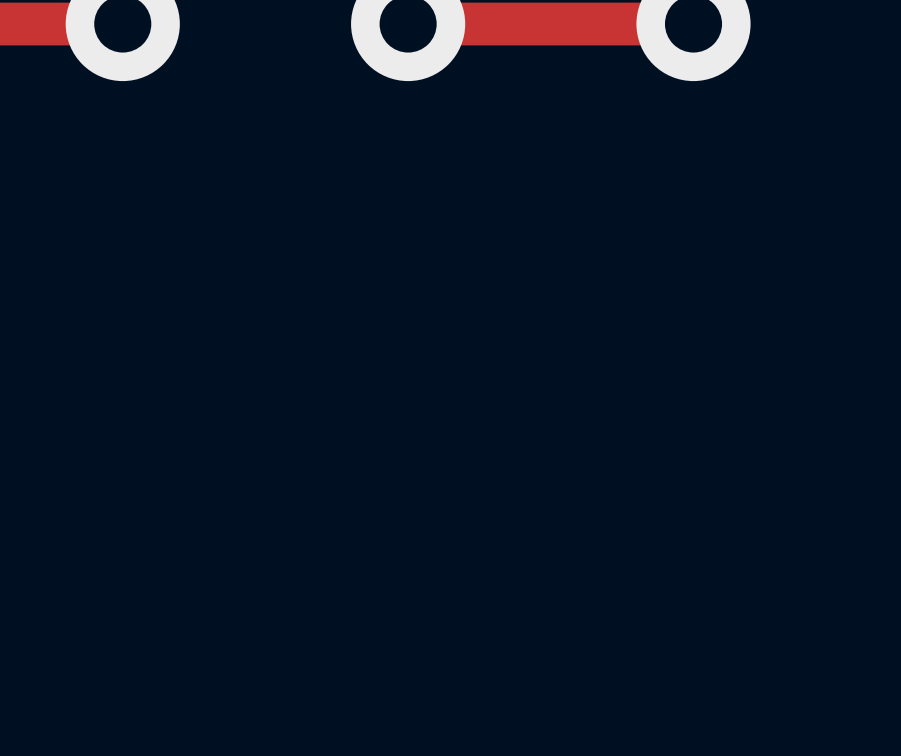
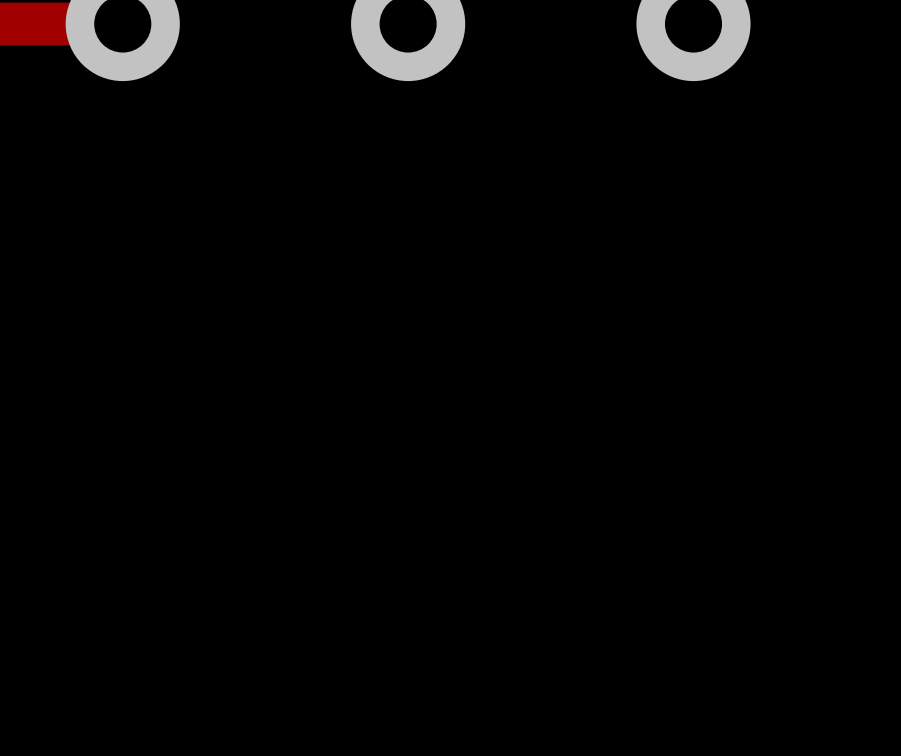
track: (408, 24) (693, 24) -> none

